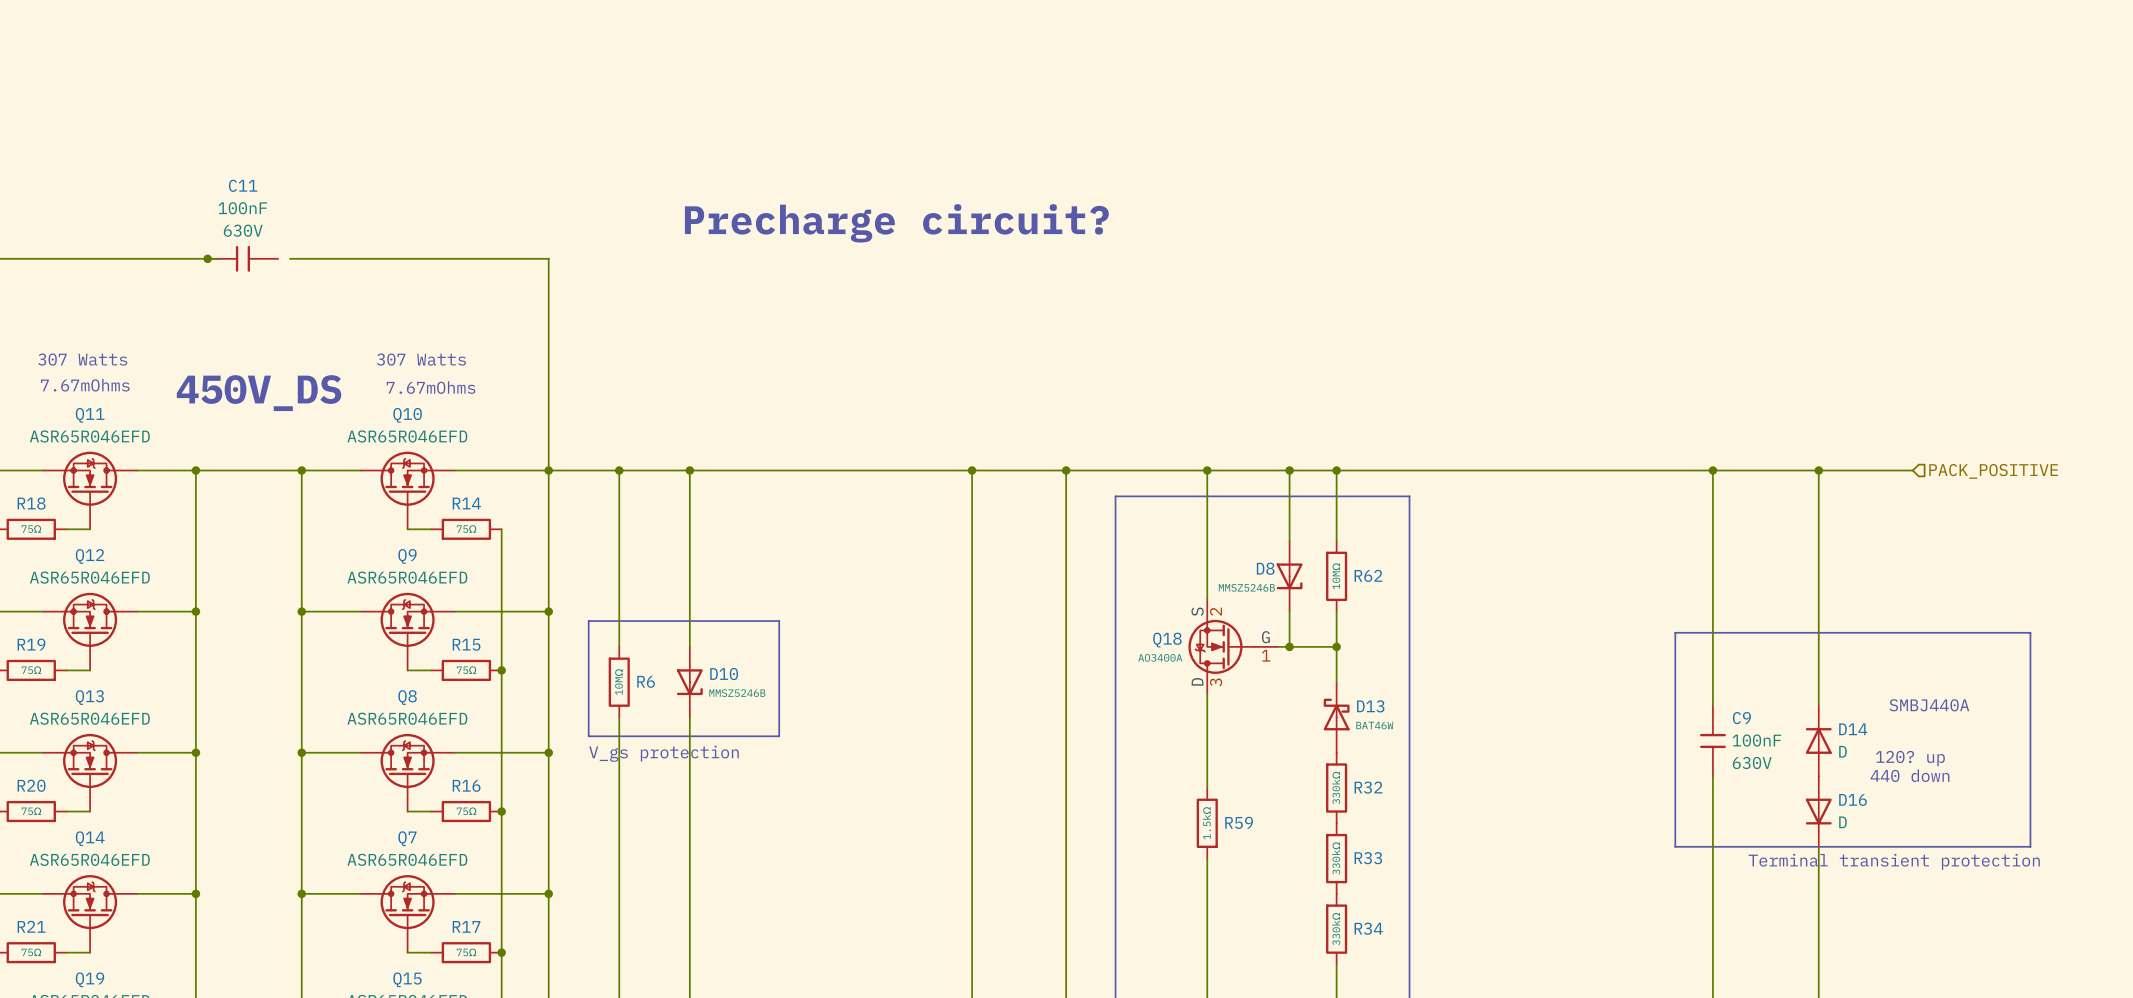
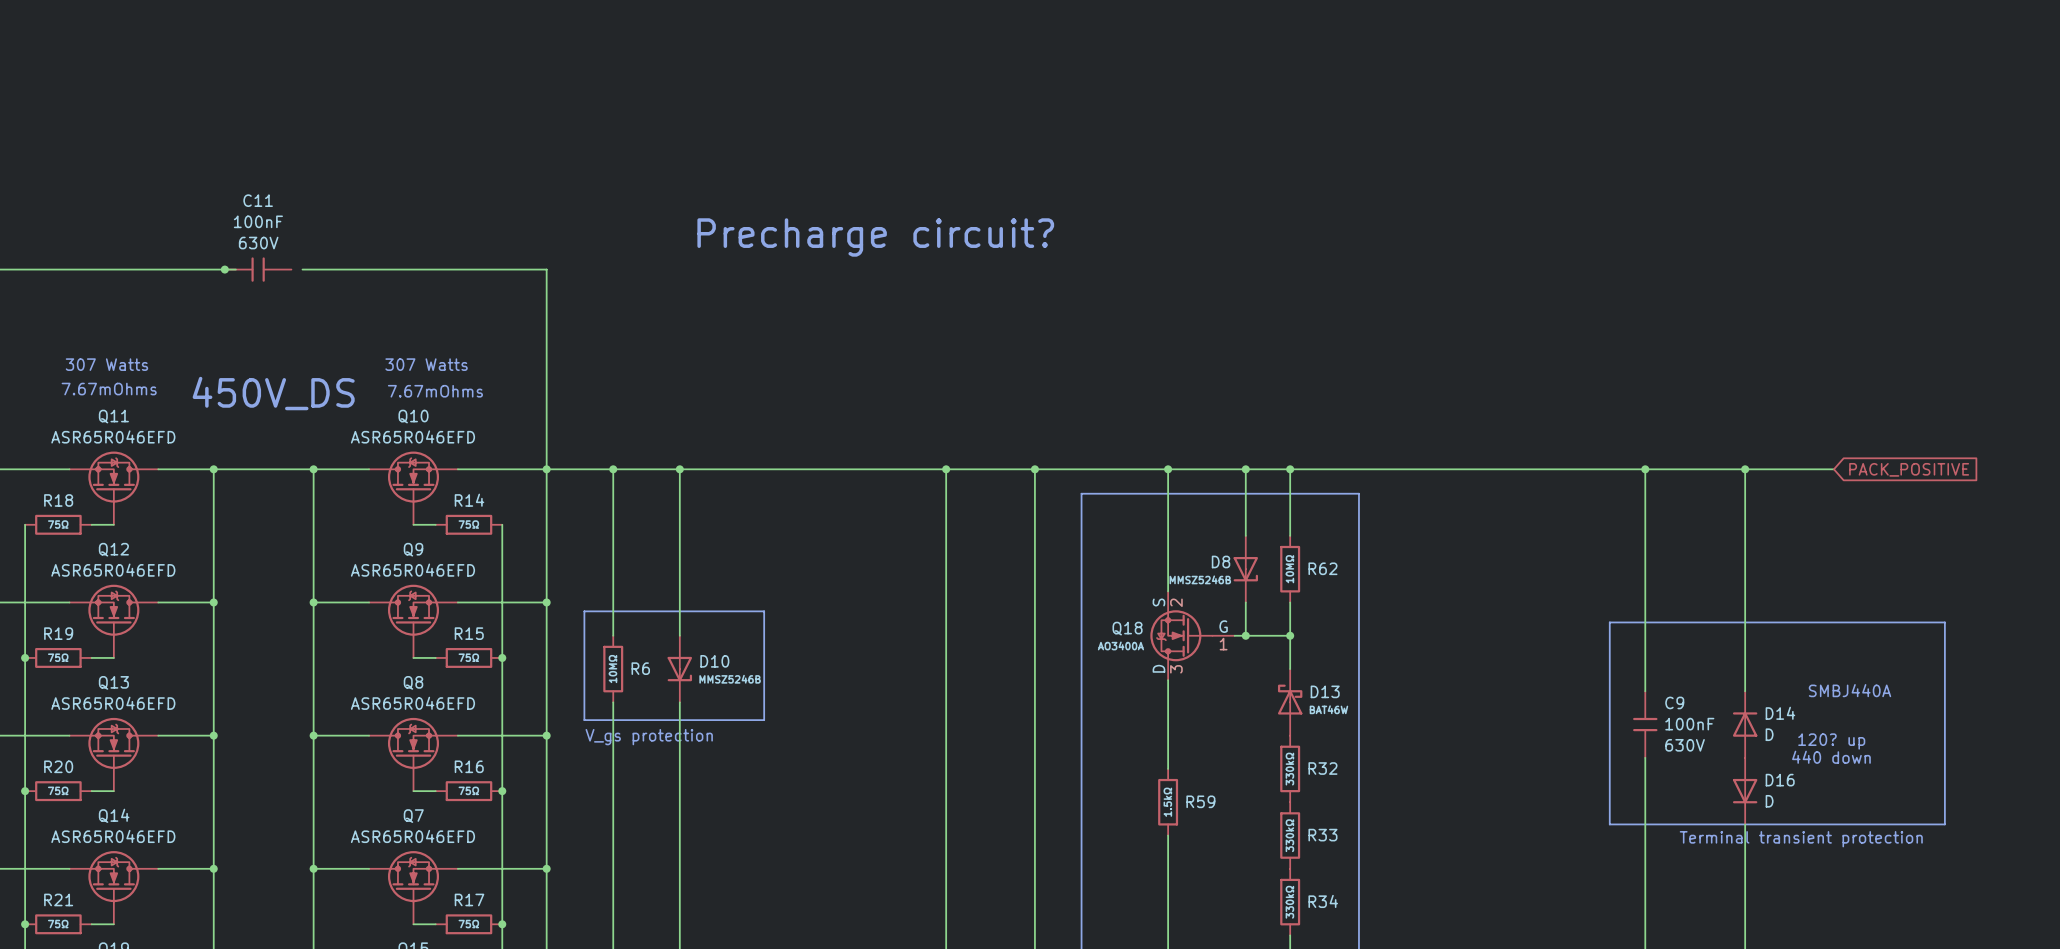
global label: none -> PACK_POSITIVE (1909, 469)
hierarchical label: PACK_POSITIVE (1993, 471) -> none

